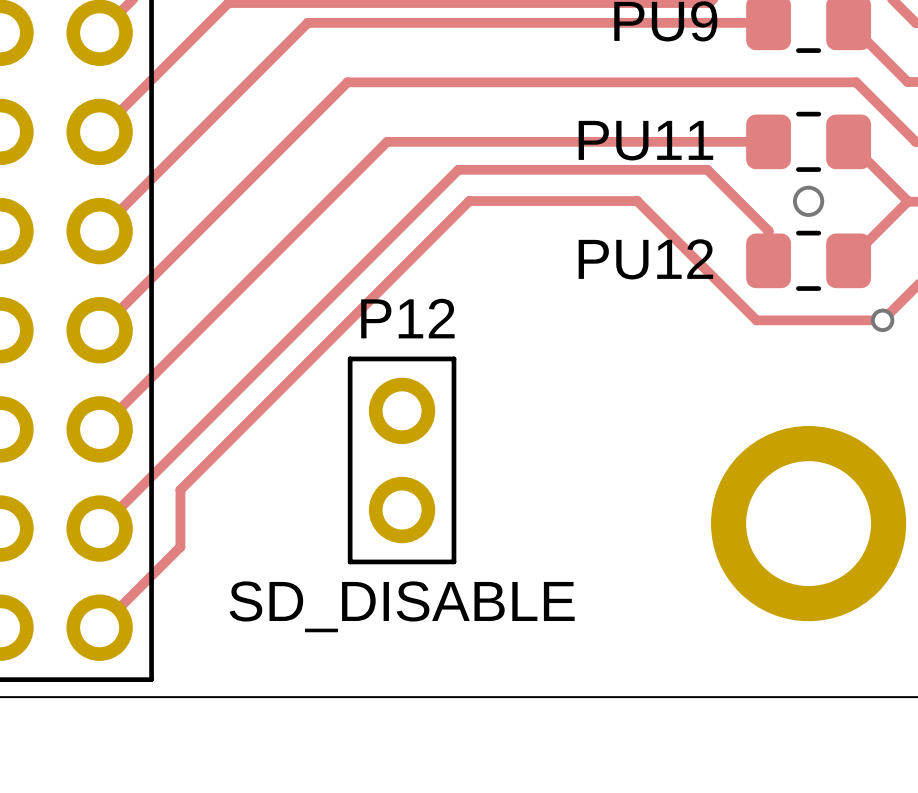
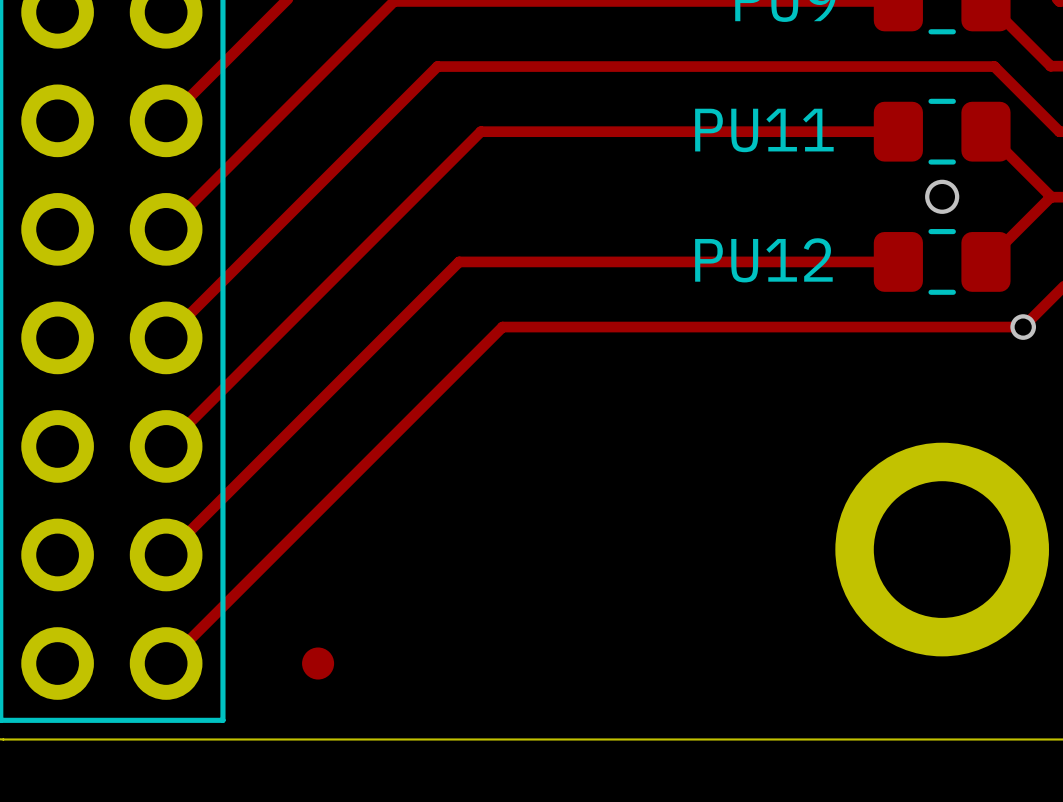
track: (367, 260) (458, 169) (707, 169) (768, 230) (768, 260) -> (459, 261) (898, 261)
track: (756, 320) (637, 201) (469, 201) (180, 489) (180, 546) -> (885, 327) (502, 327) (254, 575)
P12: SD_DISABLE (402, 460) -> none
part: none -> (318, 663)

